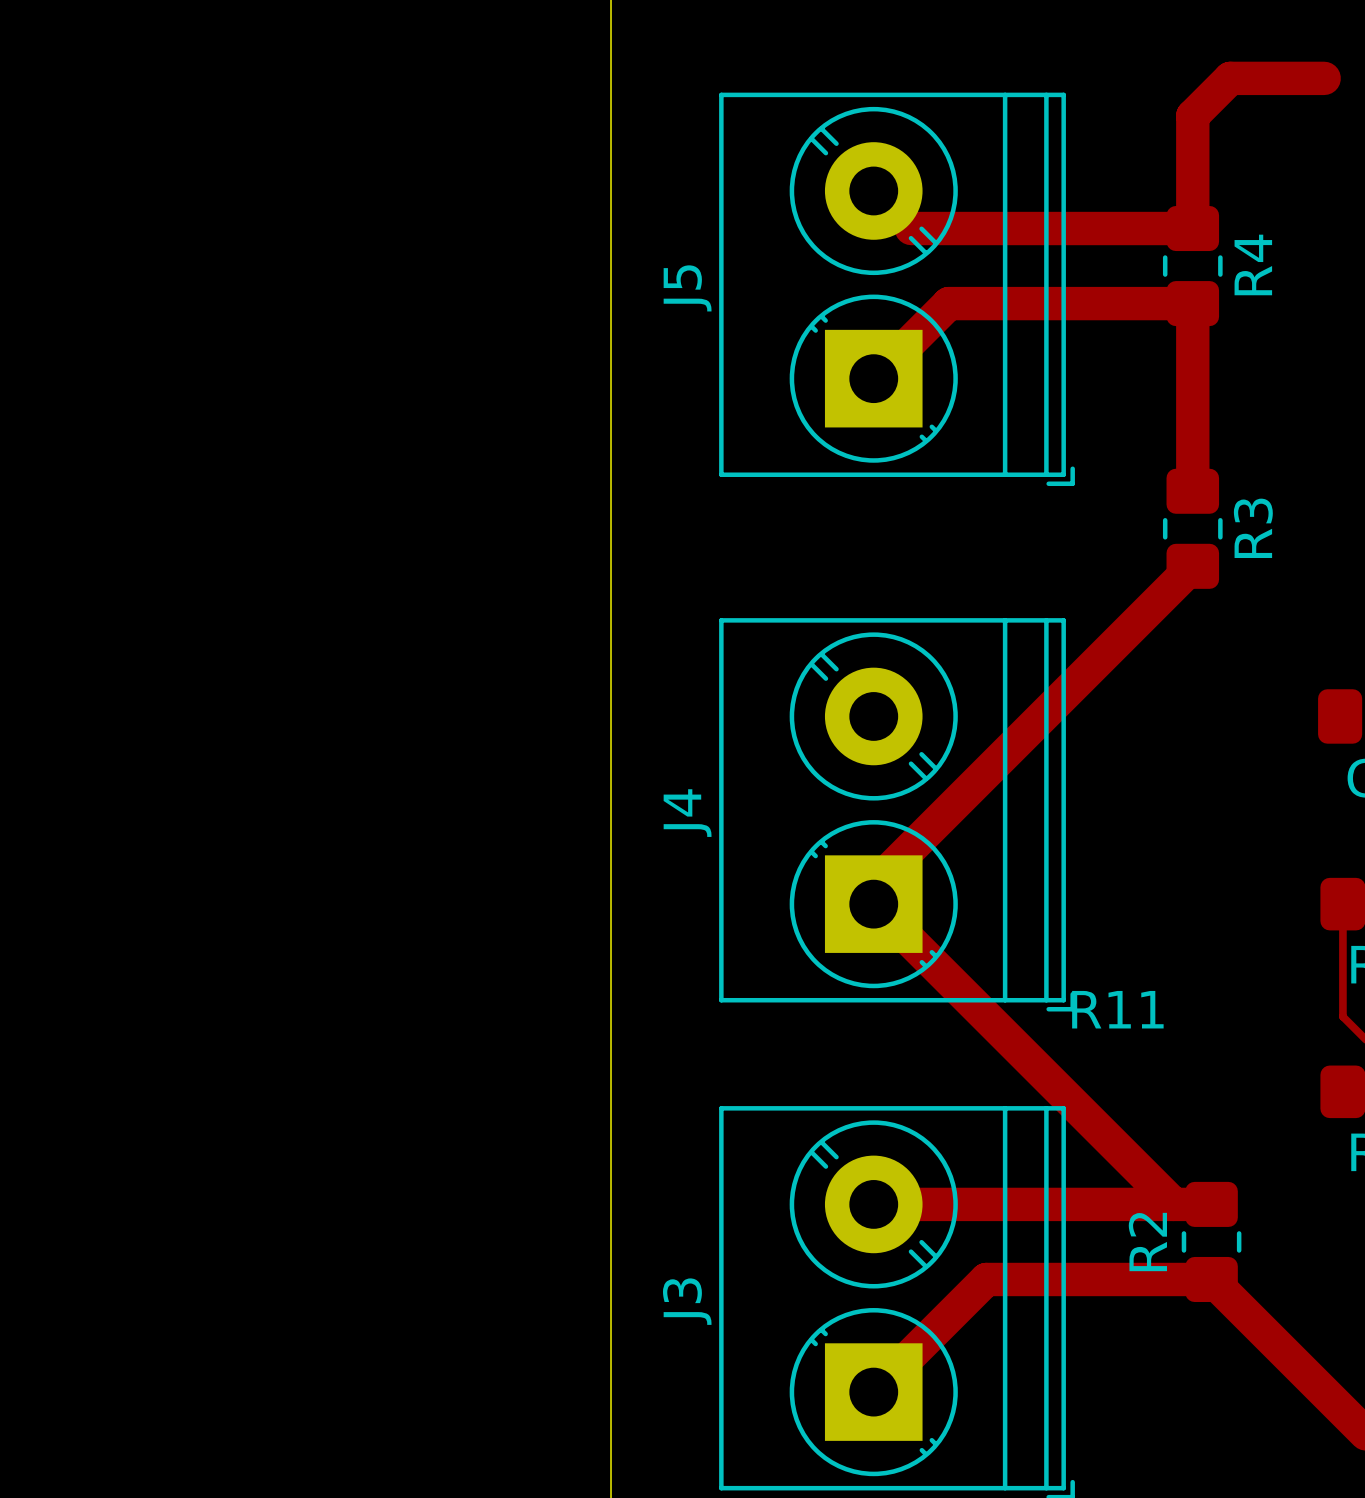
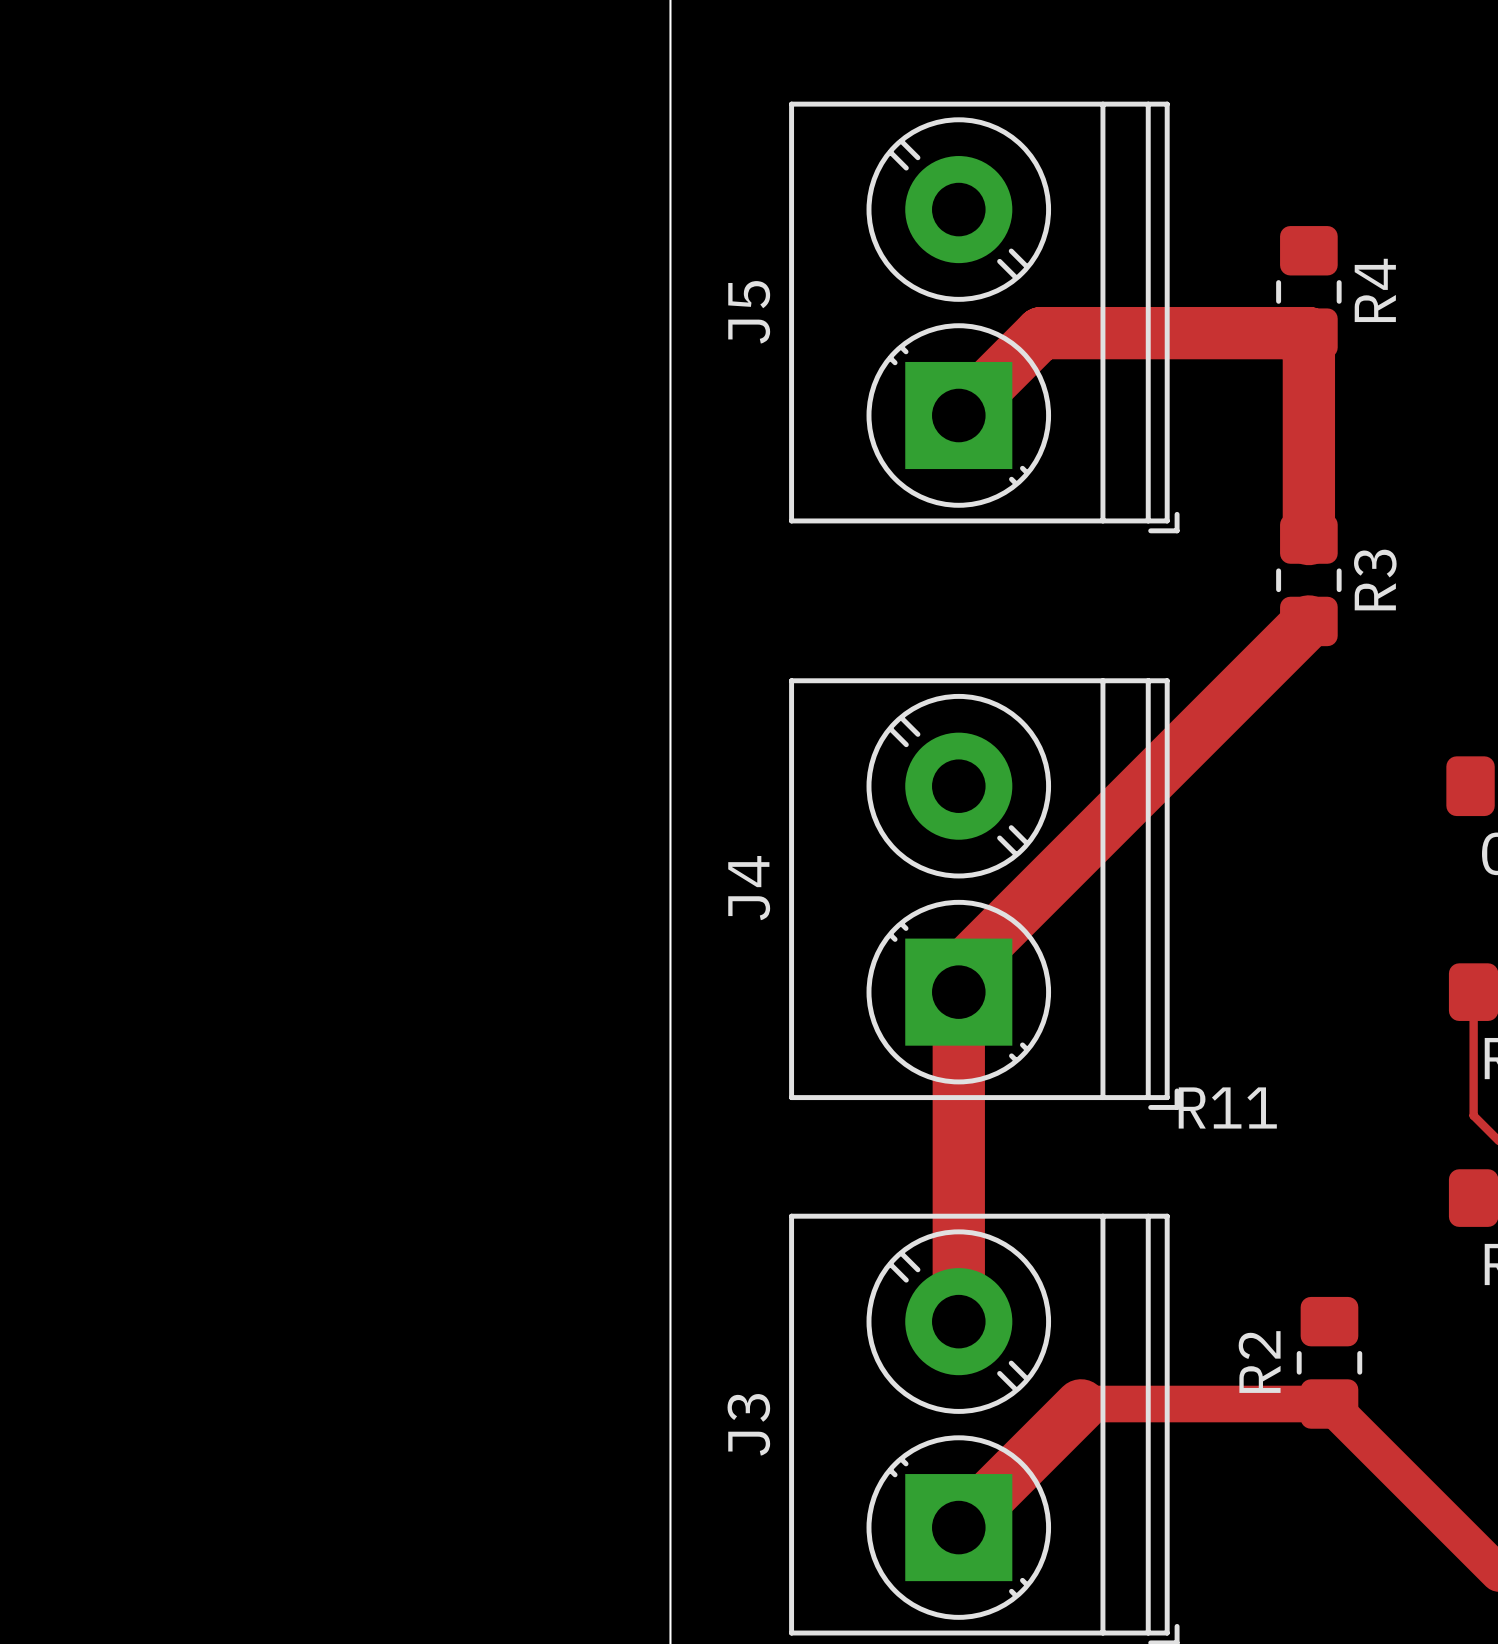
top track: (1324, 78) (1230, 78) (1192, 115) (1192, 228) (911, 228) (873, 190) -> none
top track width: thin (873, 378) (948, 303) (1192, 303) (1192, 491) -> thick (958, 415) (1041, 333) (1308, 333) (1308, 539)
top track width: thin (1192, 566) (873, 885) -> thick (1308, 621) (958, 971)
top track: (873, 885) (873, 904) (1174, 1204) (1211, 1204) (873, 1204) -> (958, 992) (958, 1321)
top track width: thin (985, 1280) (873, 1392) -> thick (1081, 1405) (958, 1527)

